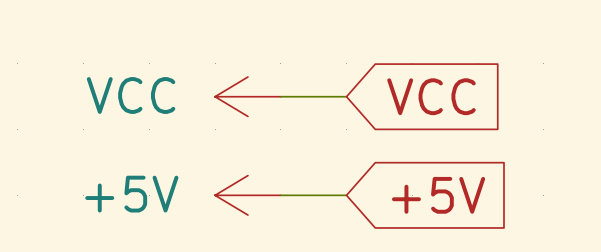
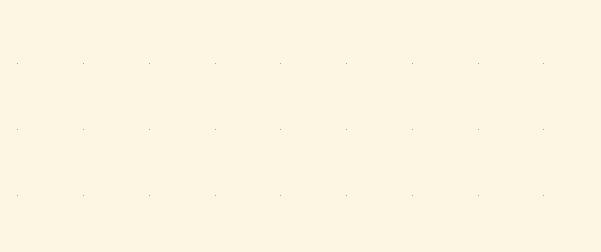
power symbol: VCC (247, 96) -> none
wire: (280, 96) (346, 96) -> none
global label: VCC (431, 96) -> none
power symbol: +5V (247, 195) -> none
wire: (280, 195) (346, 195) -> none
global label: +5V (438, 195) -> none

